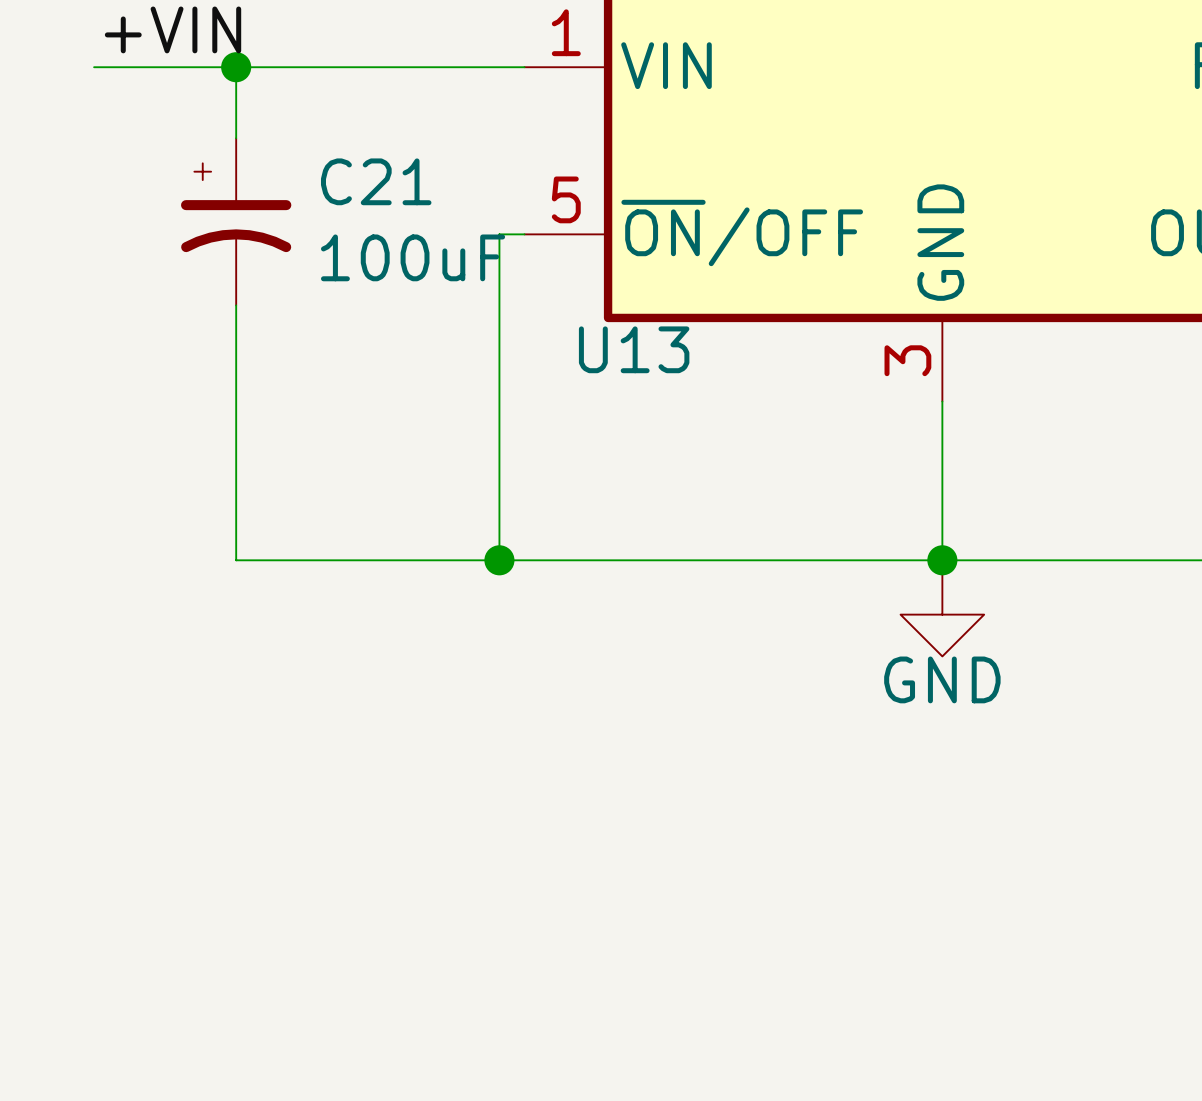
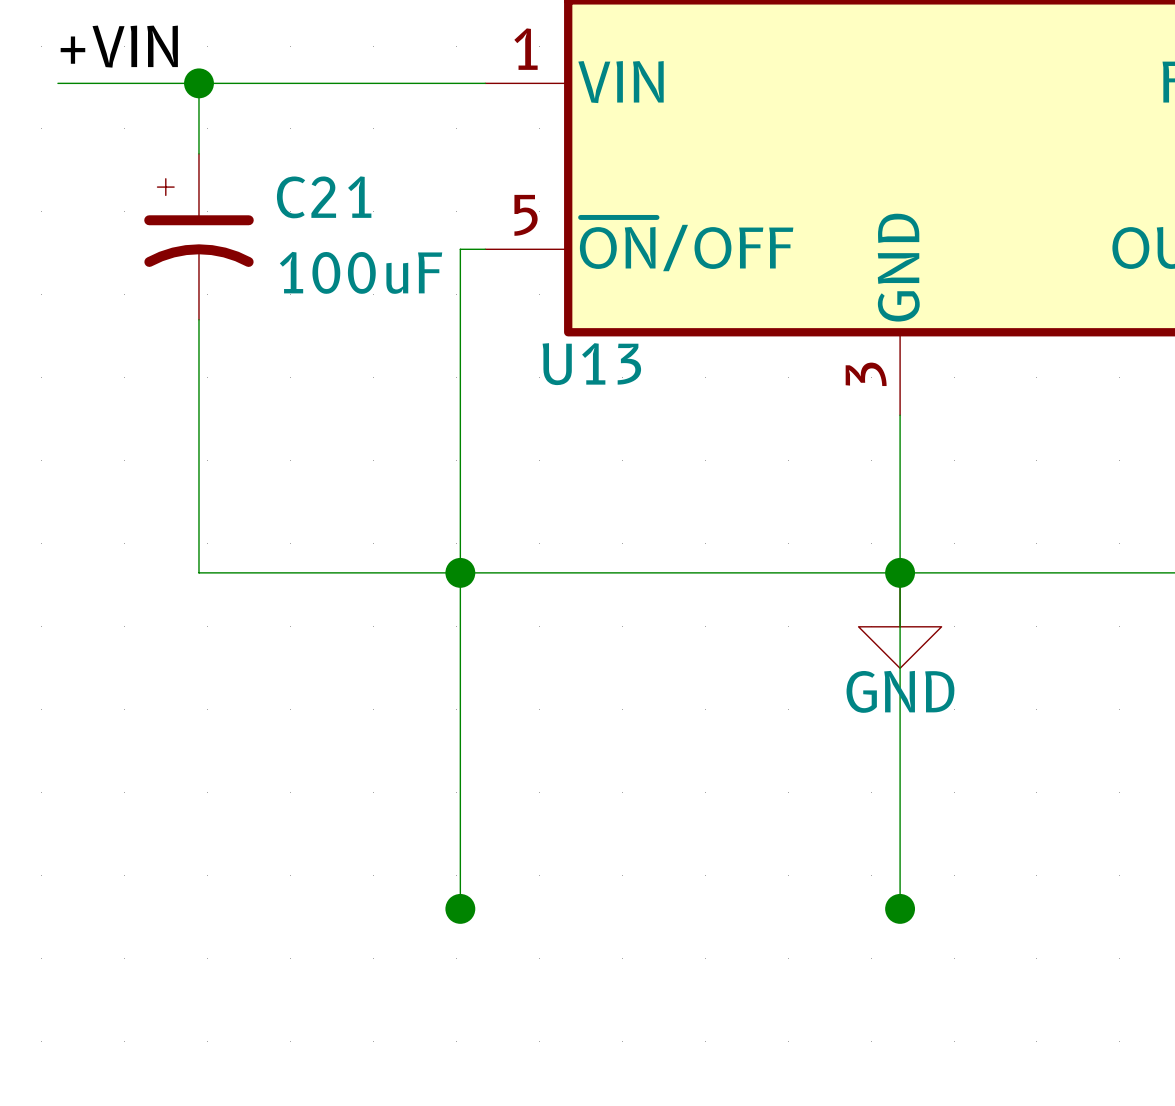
wire: none -> (460, 572) (460, 908)
wire: none -> (900, 585) (900, 908)
junction: none -> (460, 908)
junction: none -> (900, 908)

